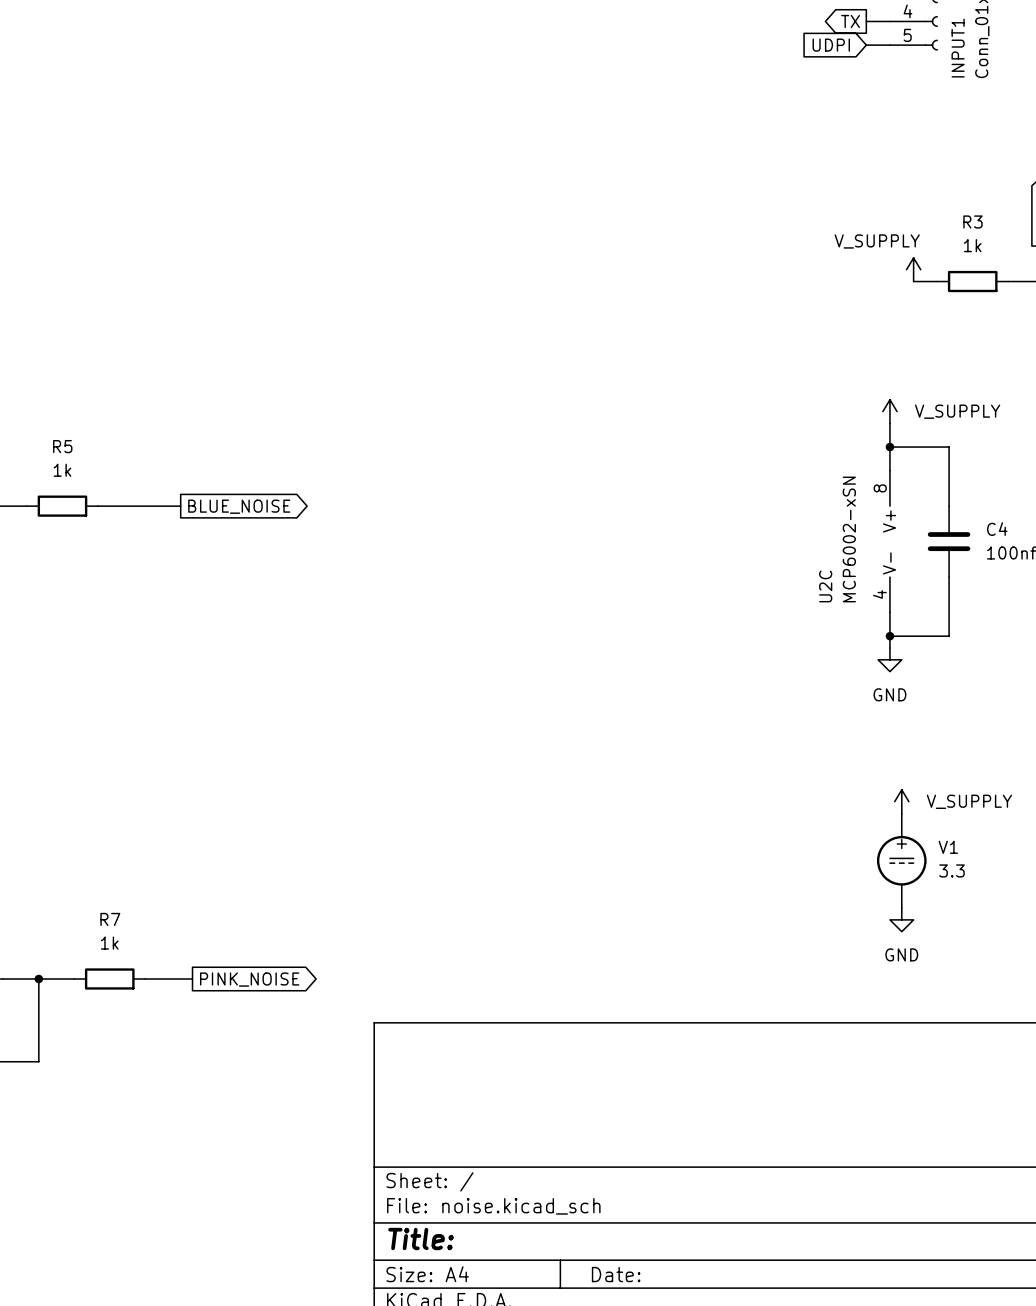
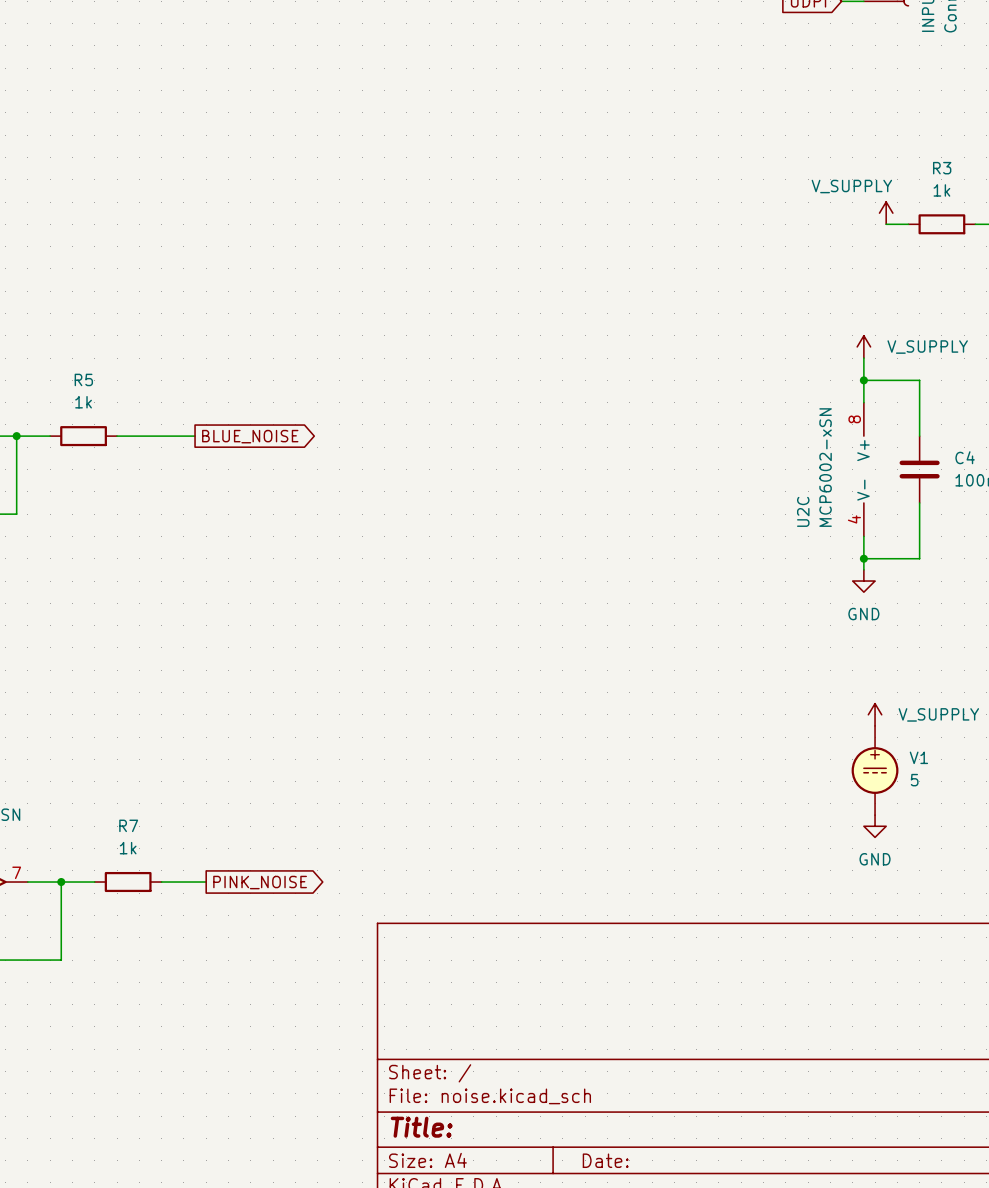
V1 value: 3.3 (951, 870) -> 5 (914, 780)

